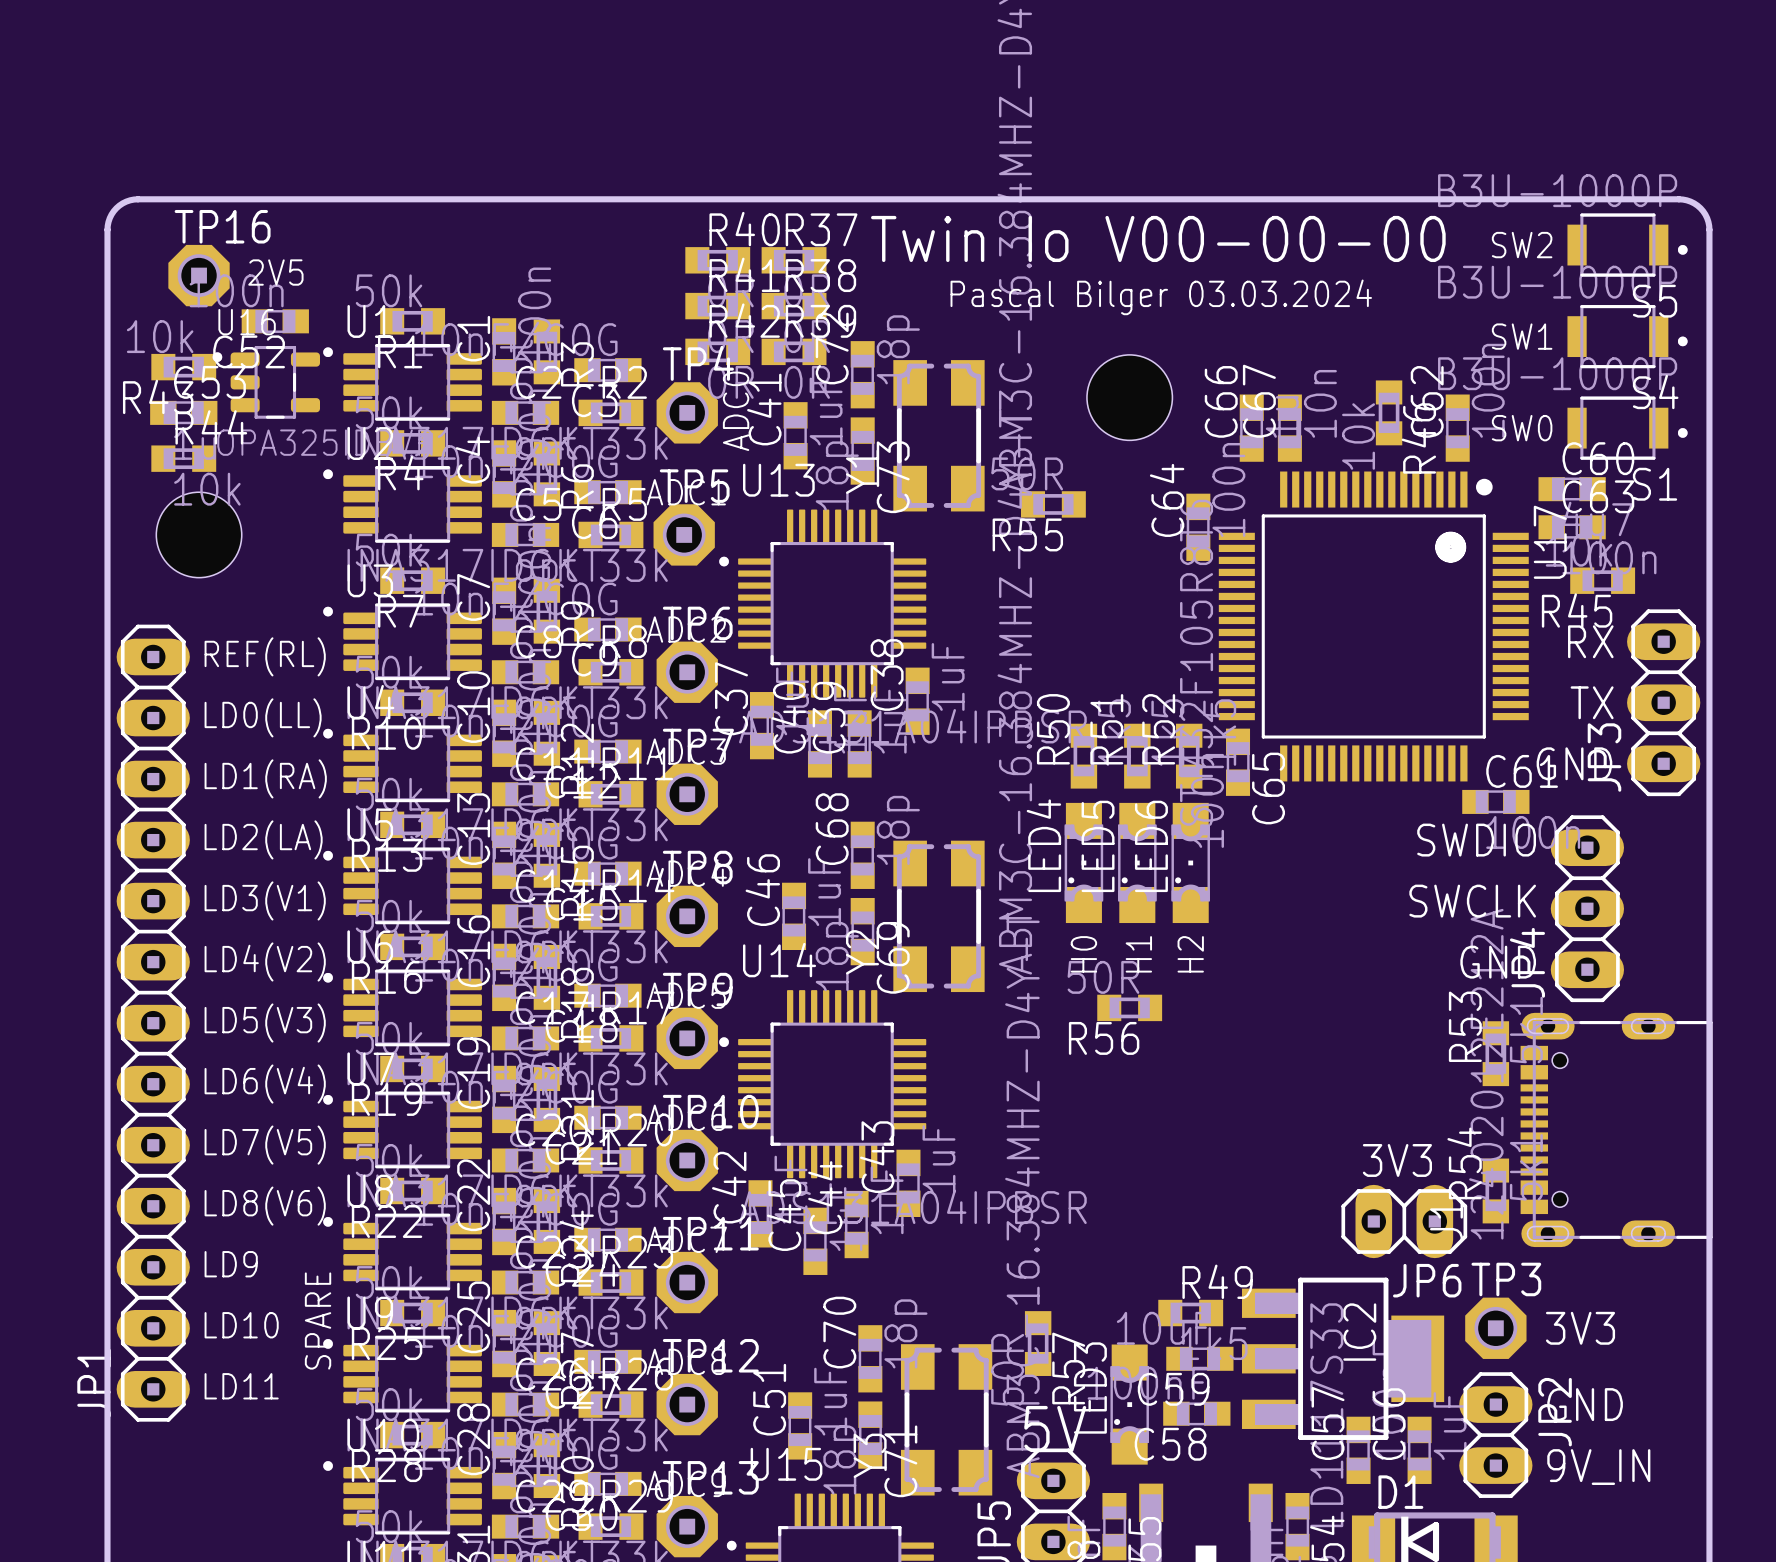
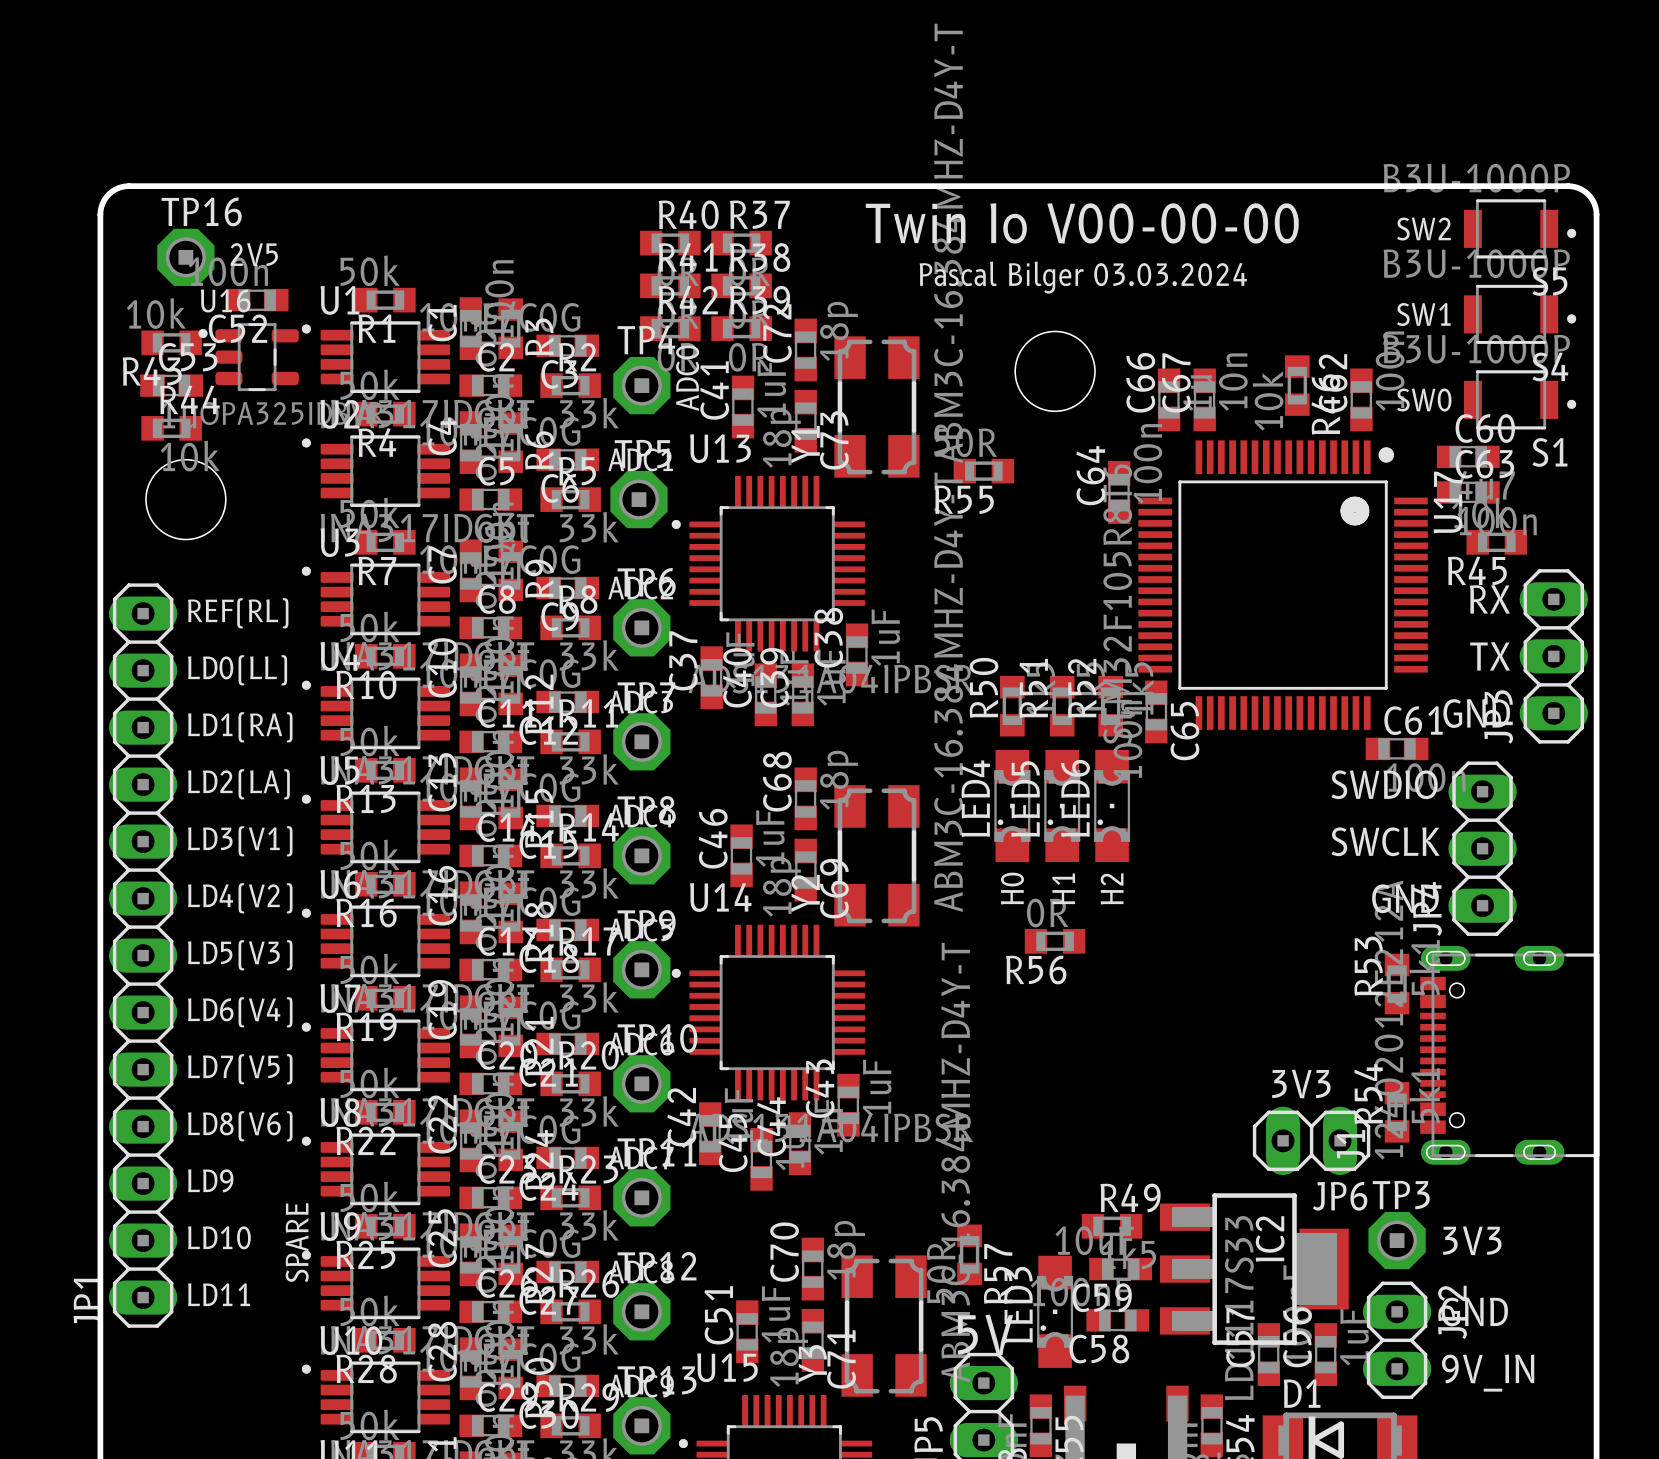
R56 value: 50R (1103, 977) -> 0R (1047, 913)

